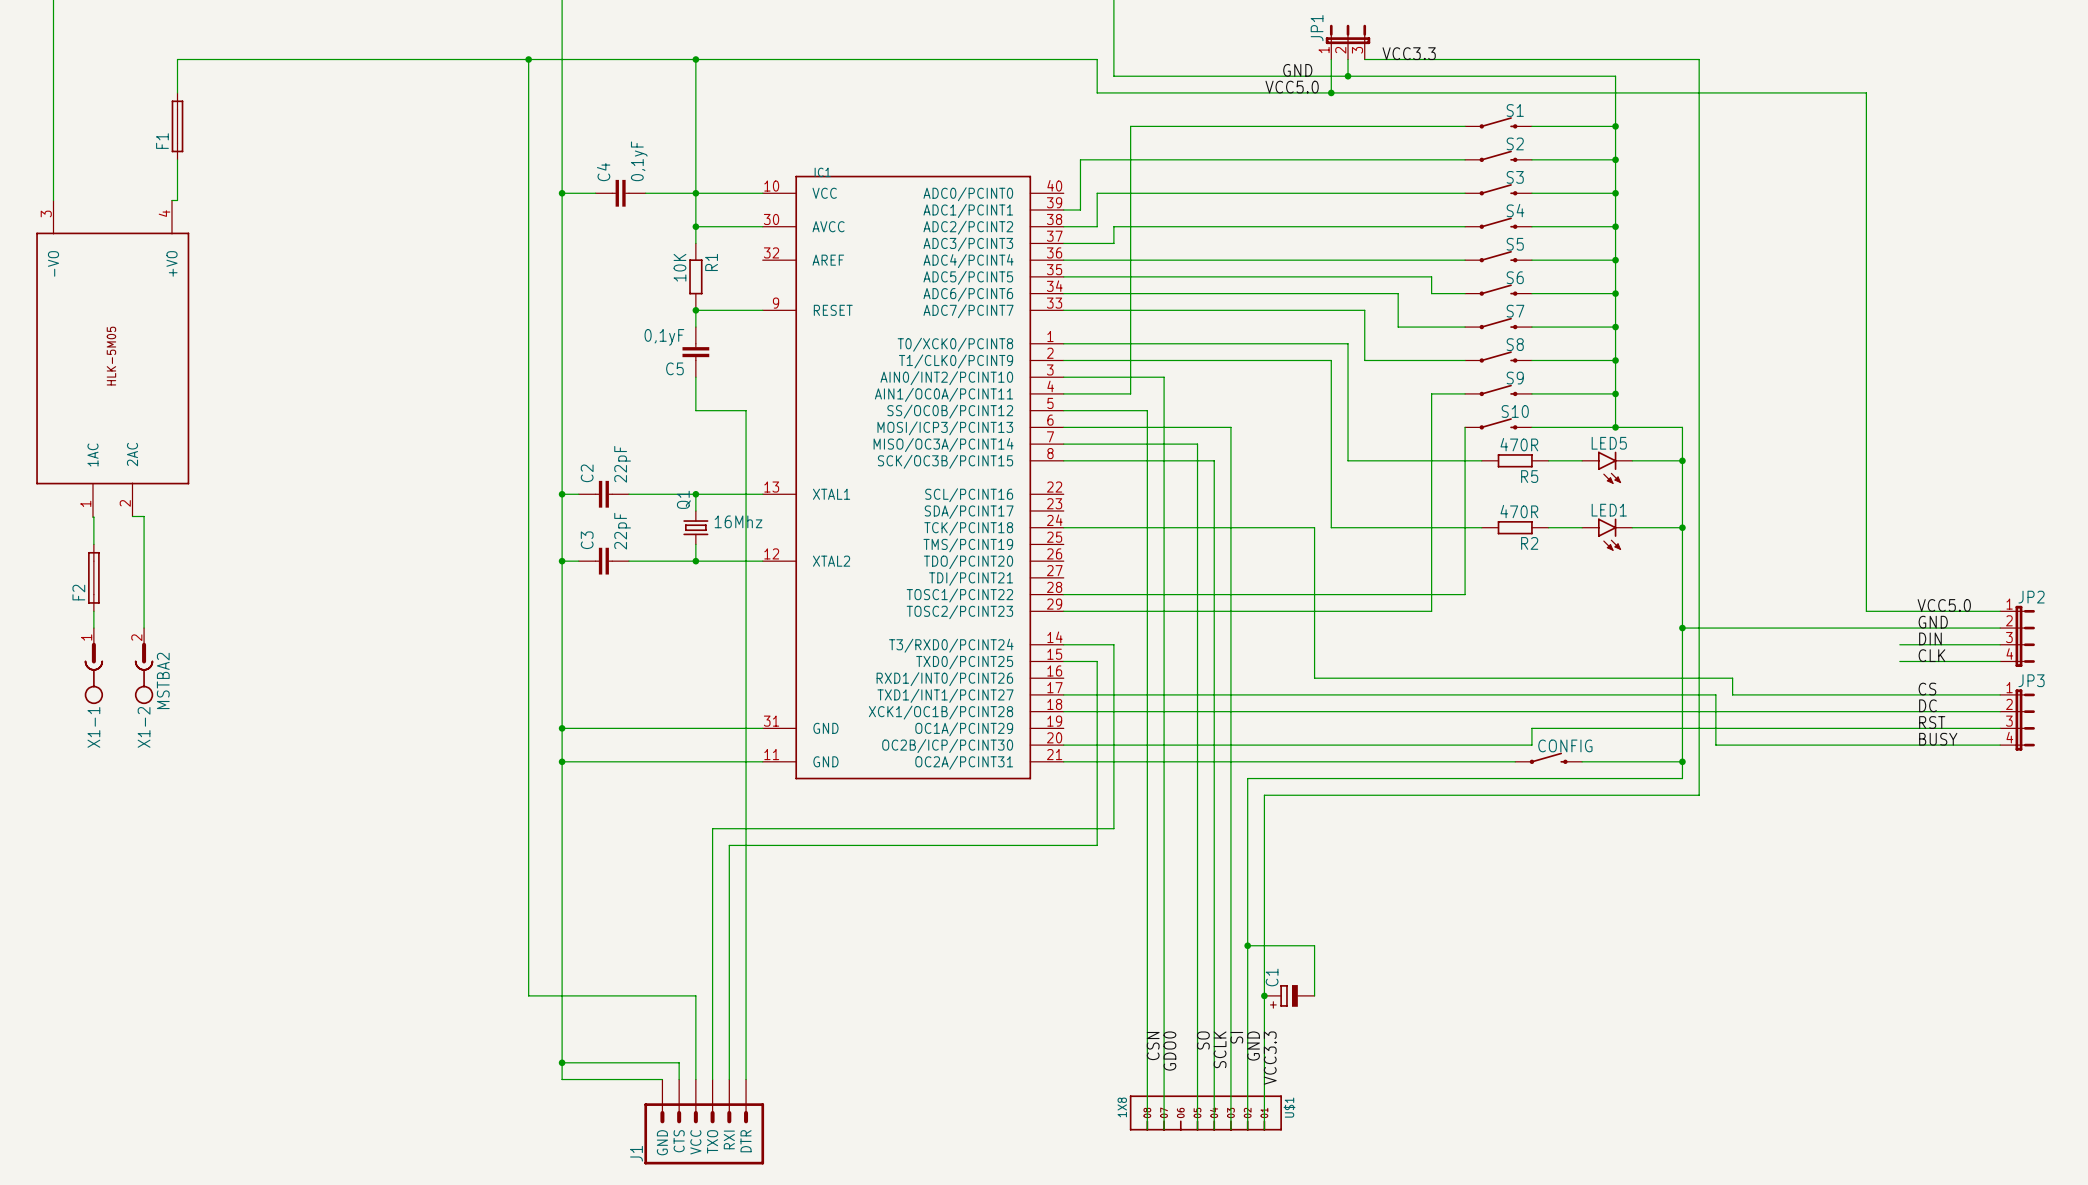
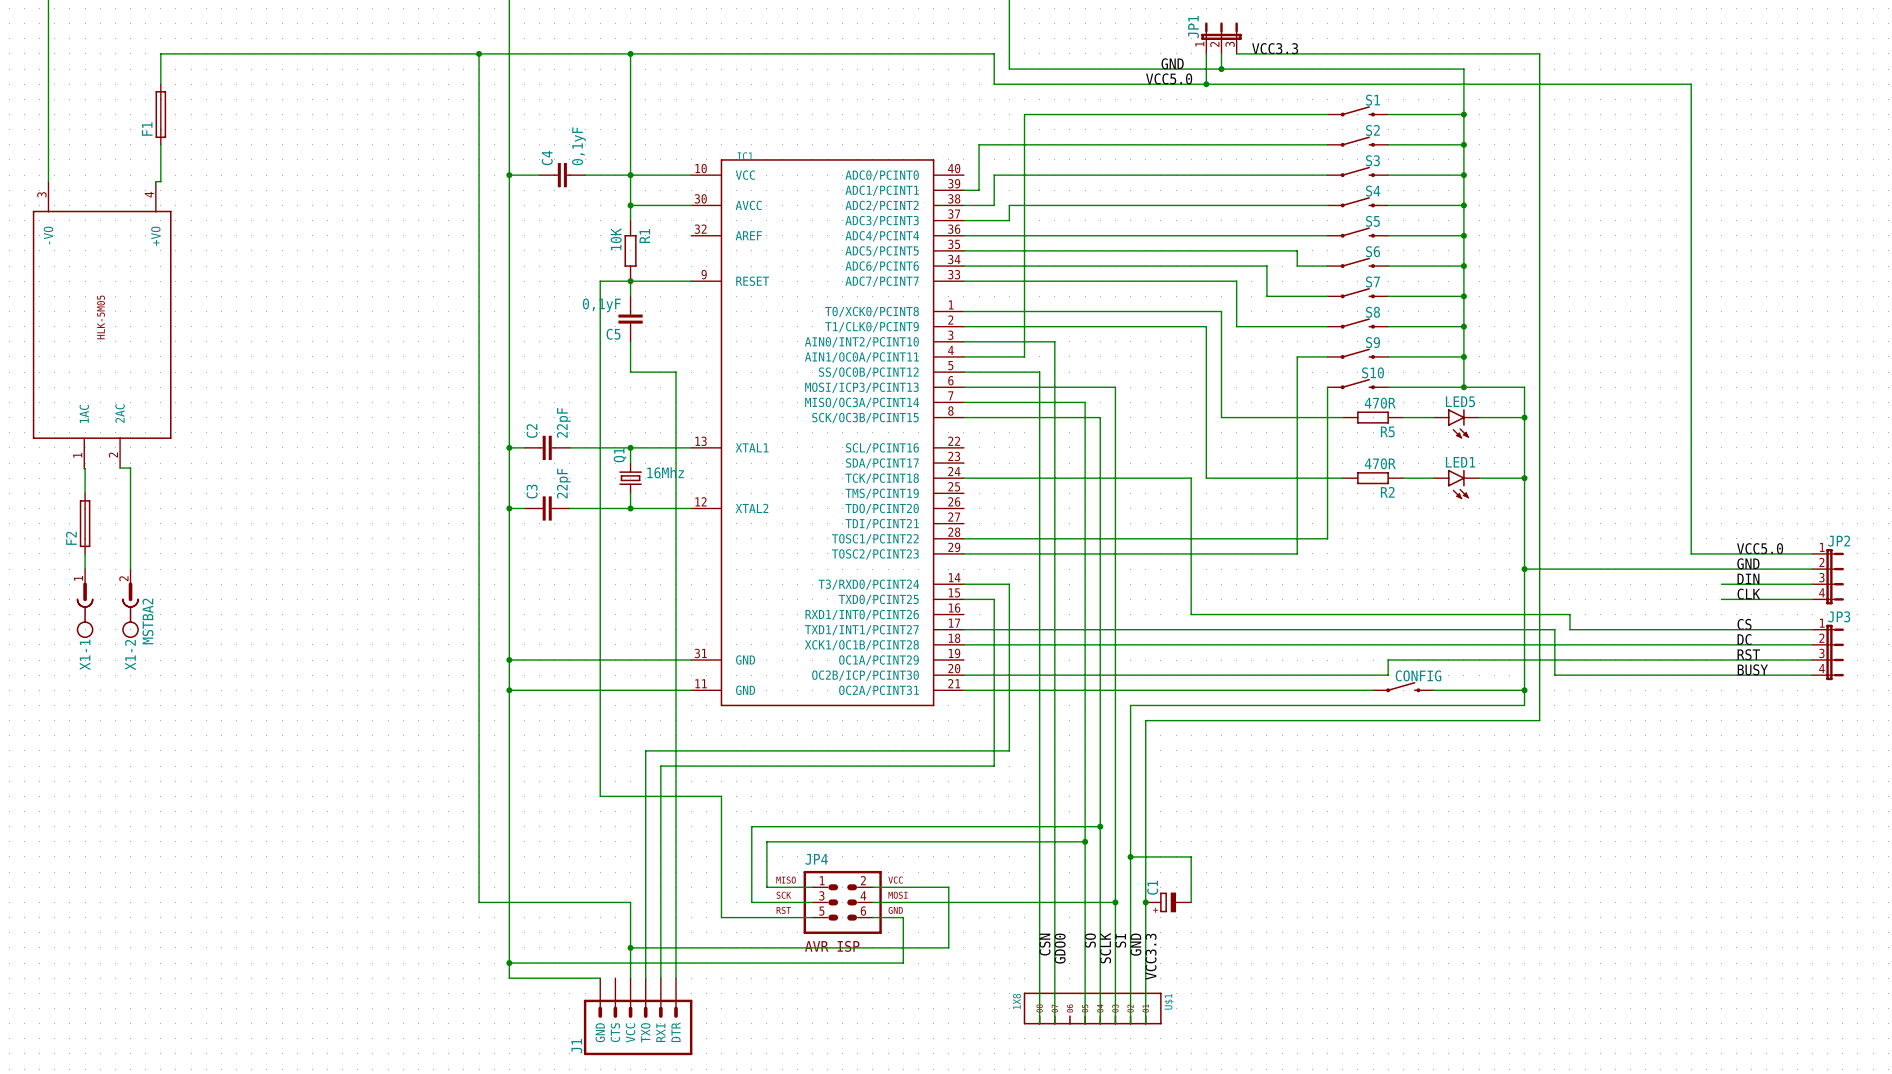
wire: none -> (630, 281) (600, 281) (600, 796) (721, 796) (721, 917) (812, 917)
wire: none -> (1100, 826) (751, 826) (751, 902) (812, 902)
junction: none -> (1100, 826)
wire: none -> (1085, 841) (766, 841) (766, 887) (812, 887)
junction: none -> (1085, 841)
wire: none -> (872, 887) (948, 887) (948, 947) (630, 947)
JP4: none -> (842, 902)
wire: none -> (872, 902) (1115, 902)
junction: none -> (1115, 902)
junction: none -> (630, 947)
wire: (679, 1062) (679, 1079) -> (615, 963) (903, 963) (903, 917) (872, 917)

